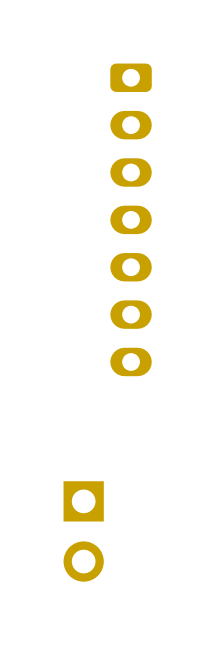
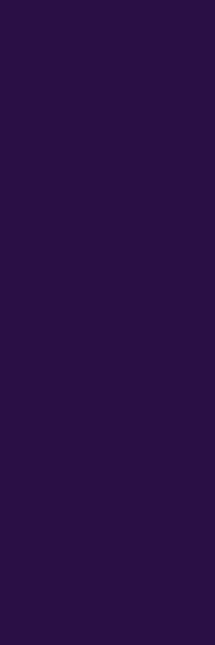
part: (131, 219) -> none
part: (83, 531) -> none

